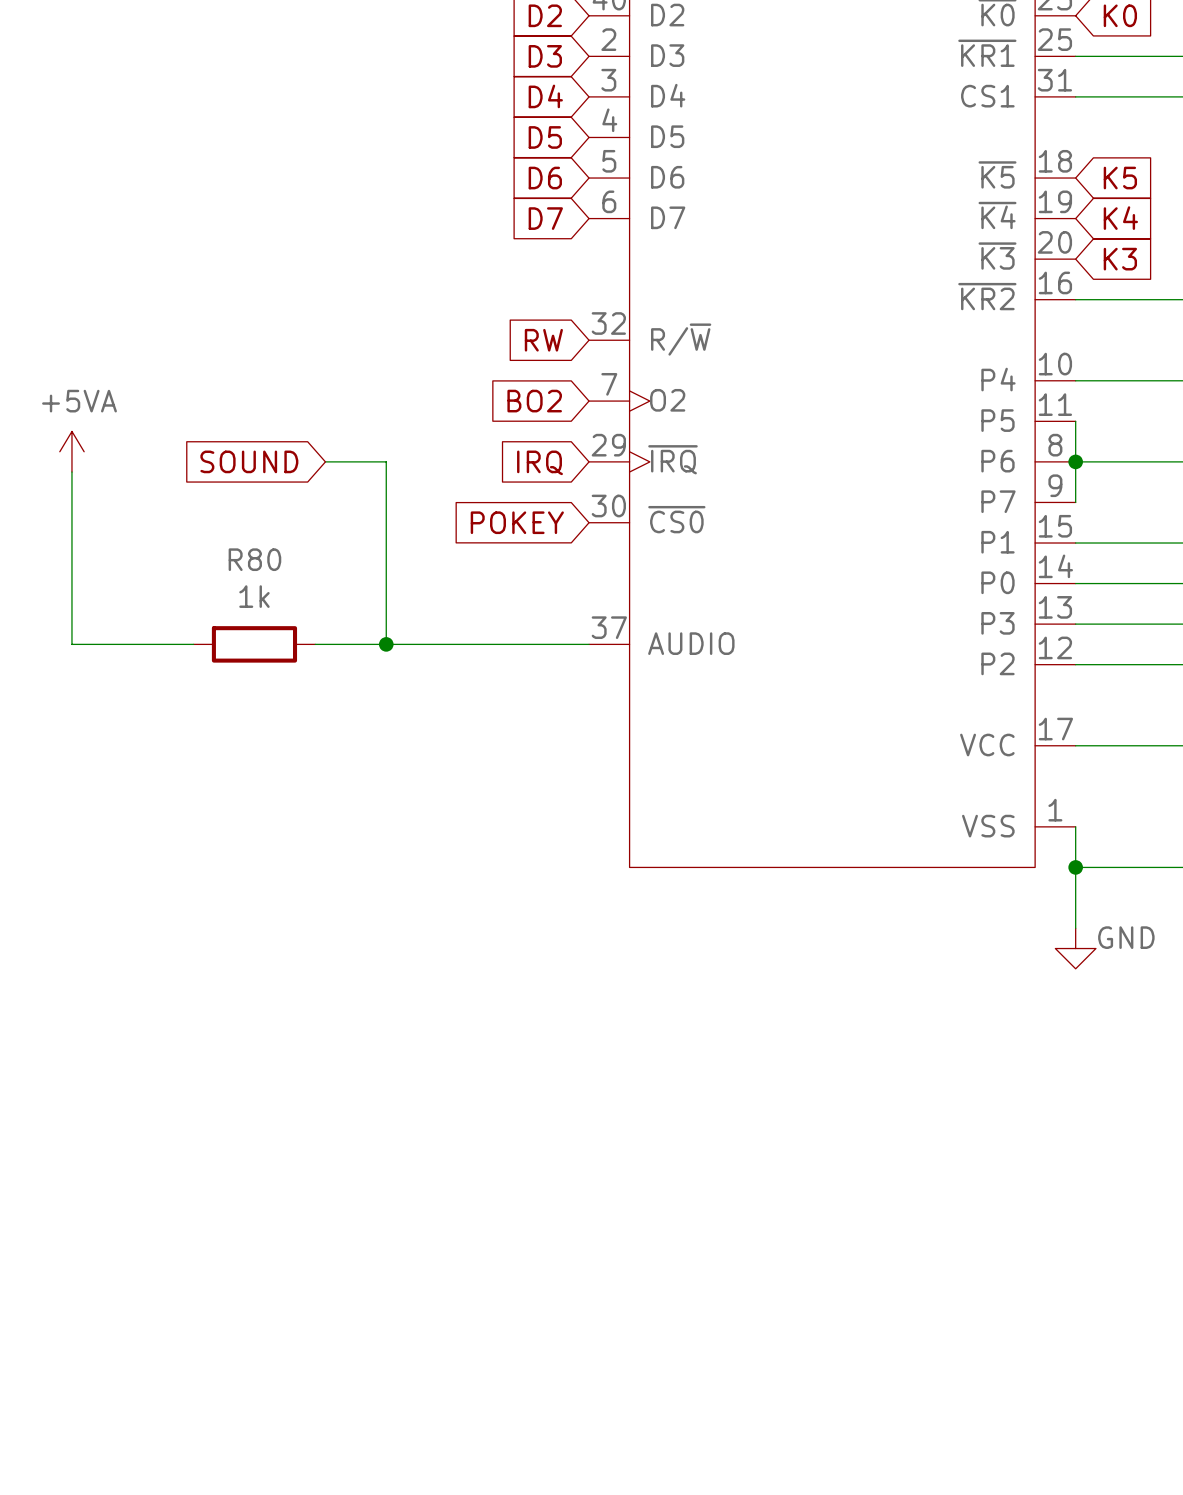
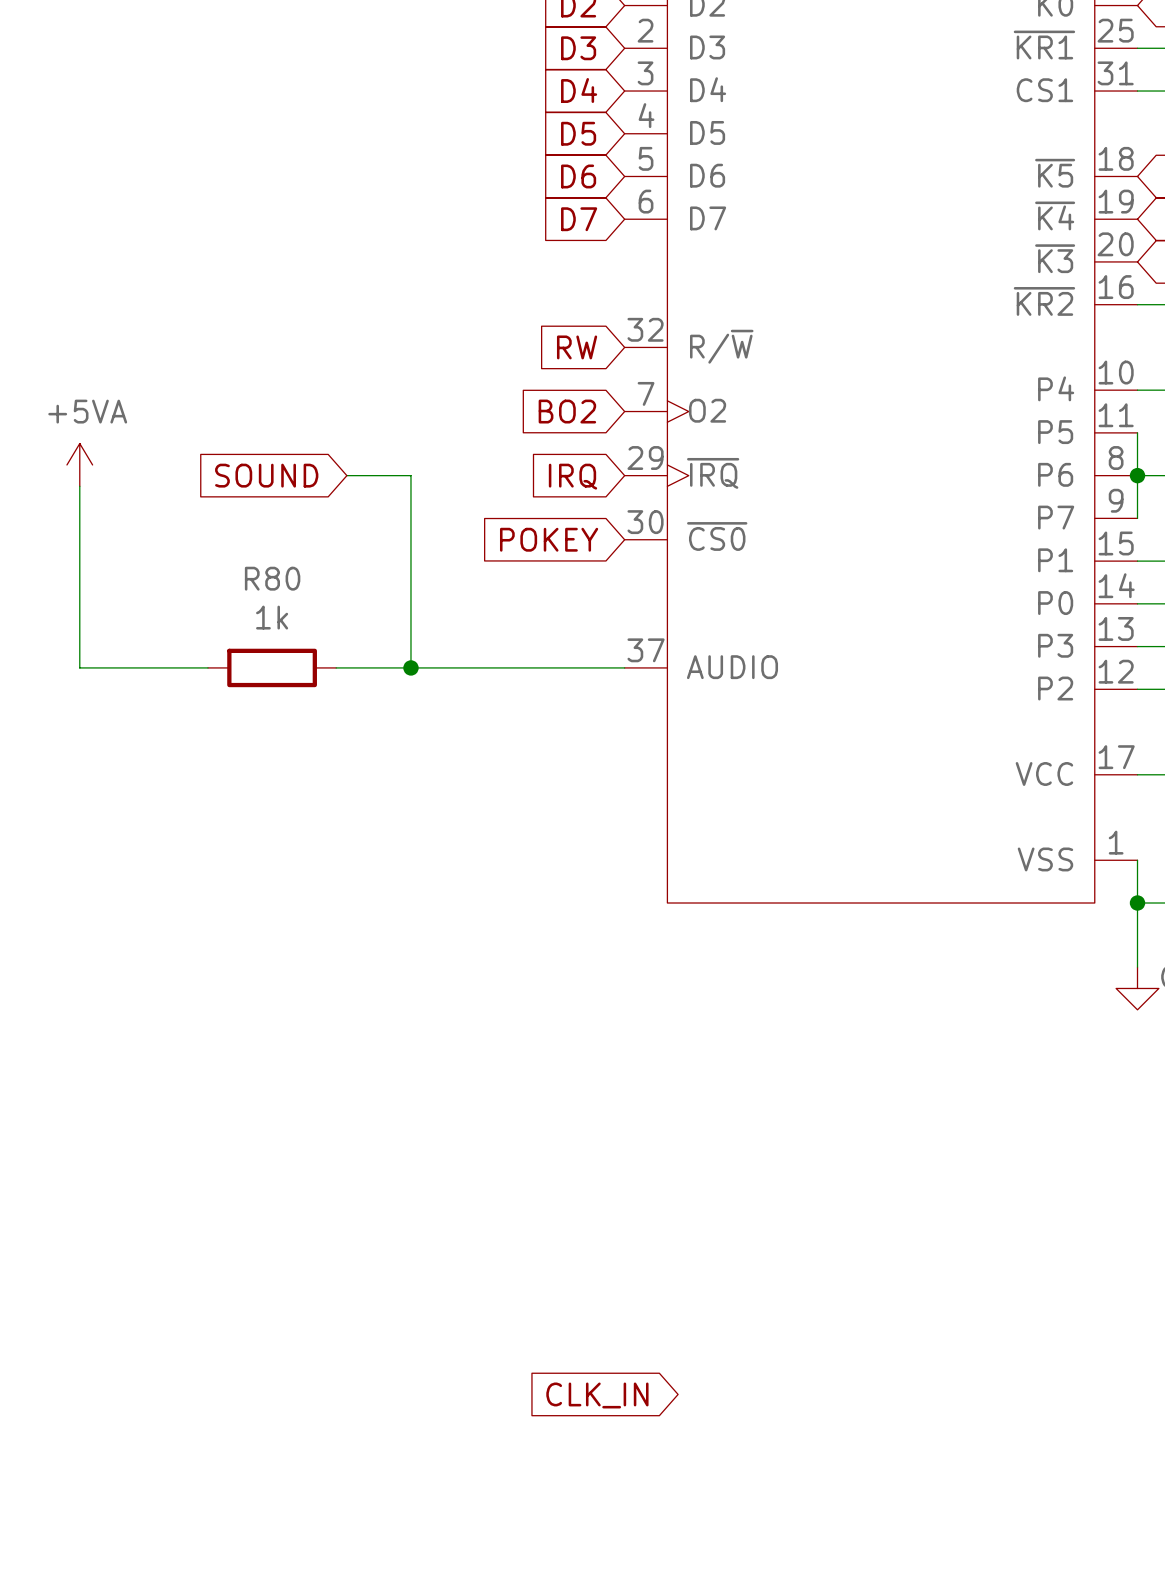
global label: none -> CLK_IN (597, 1395)

